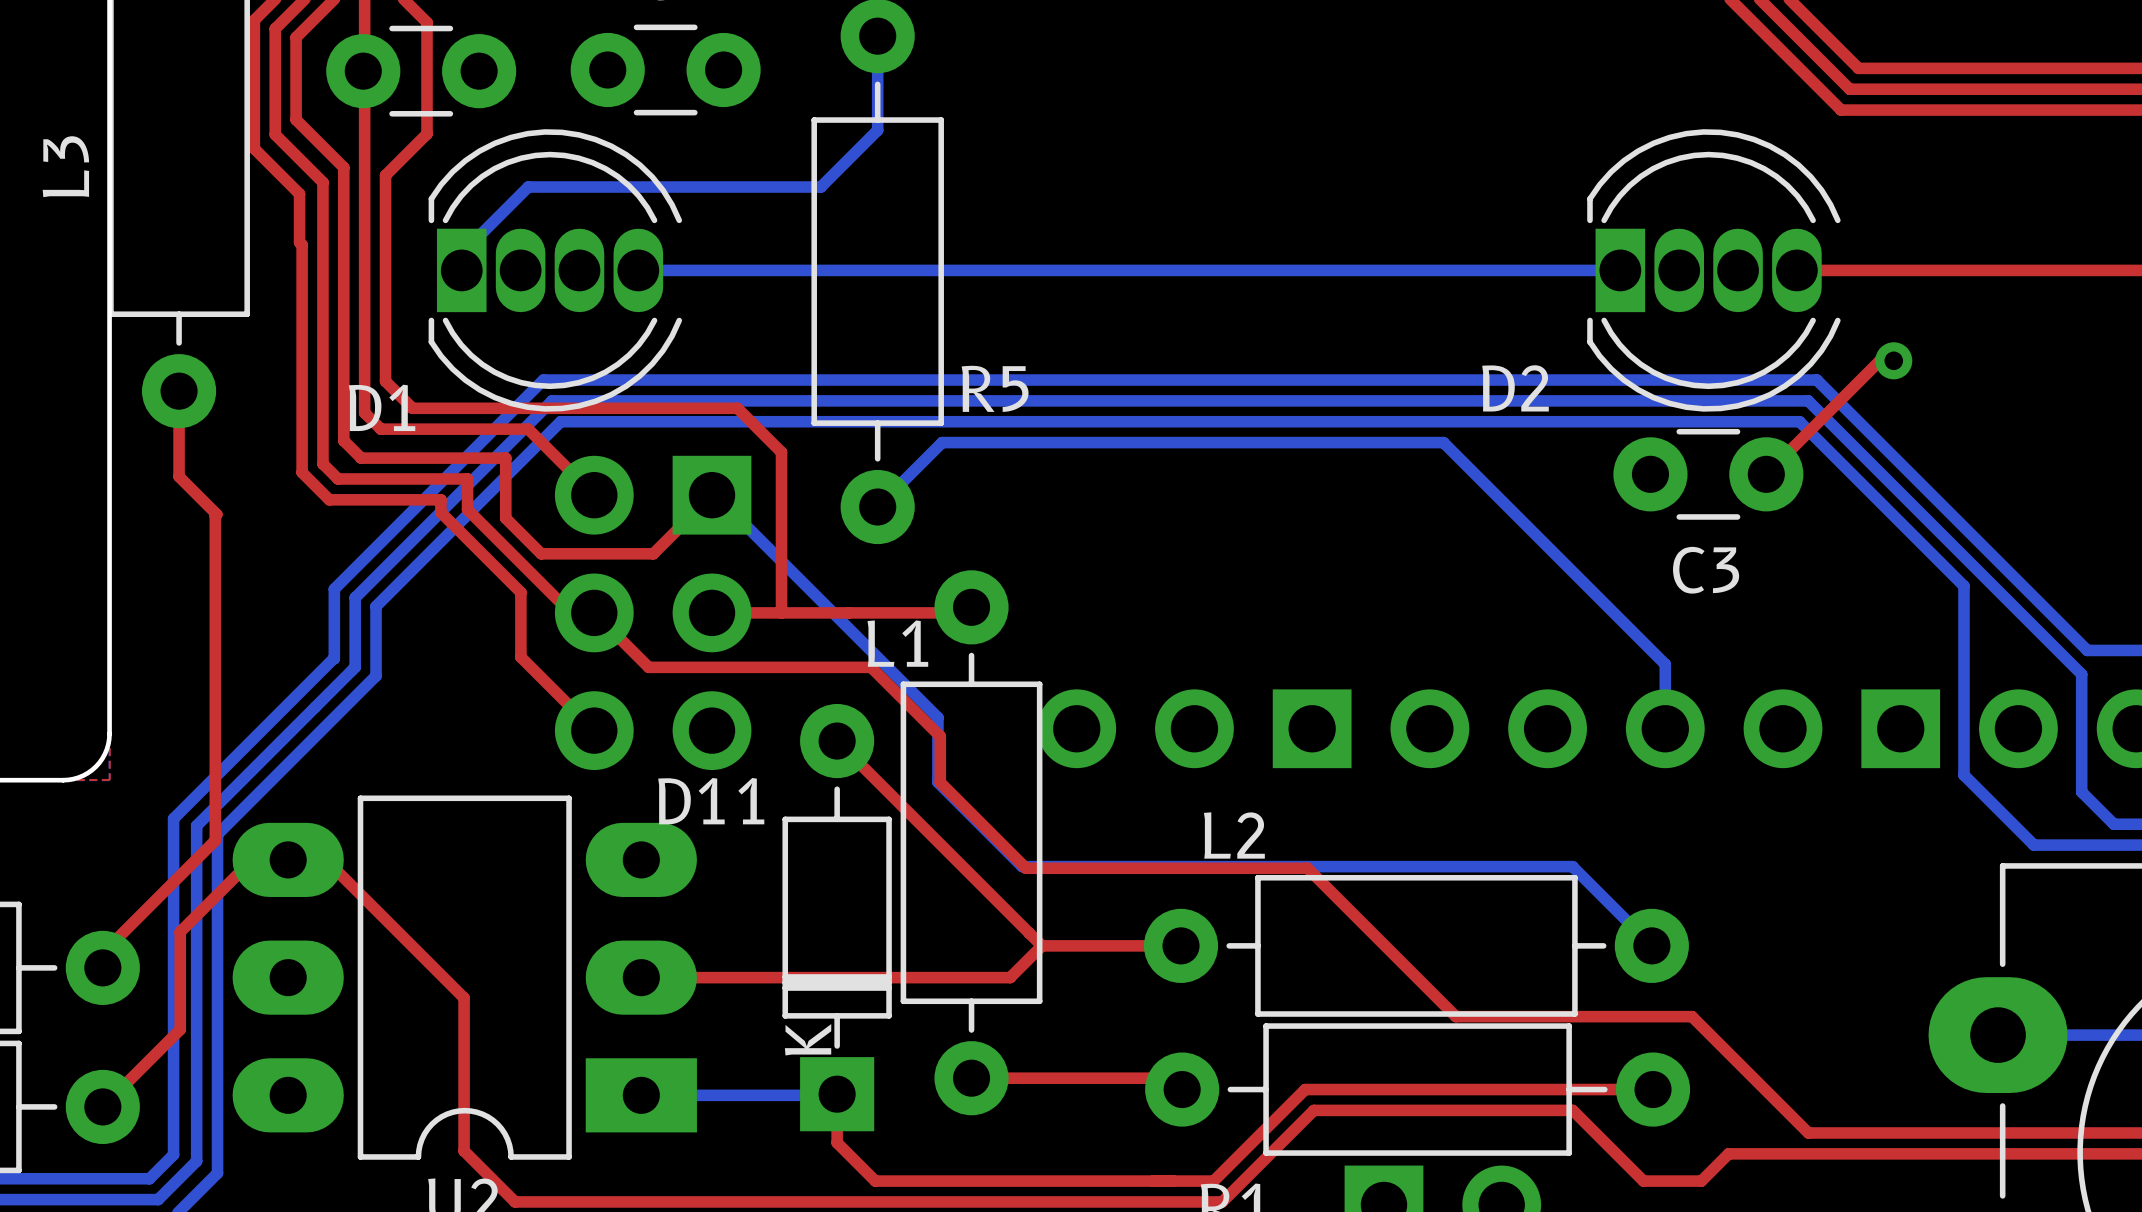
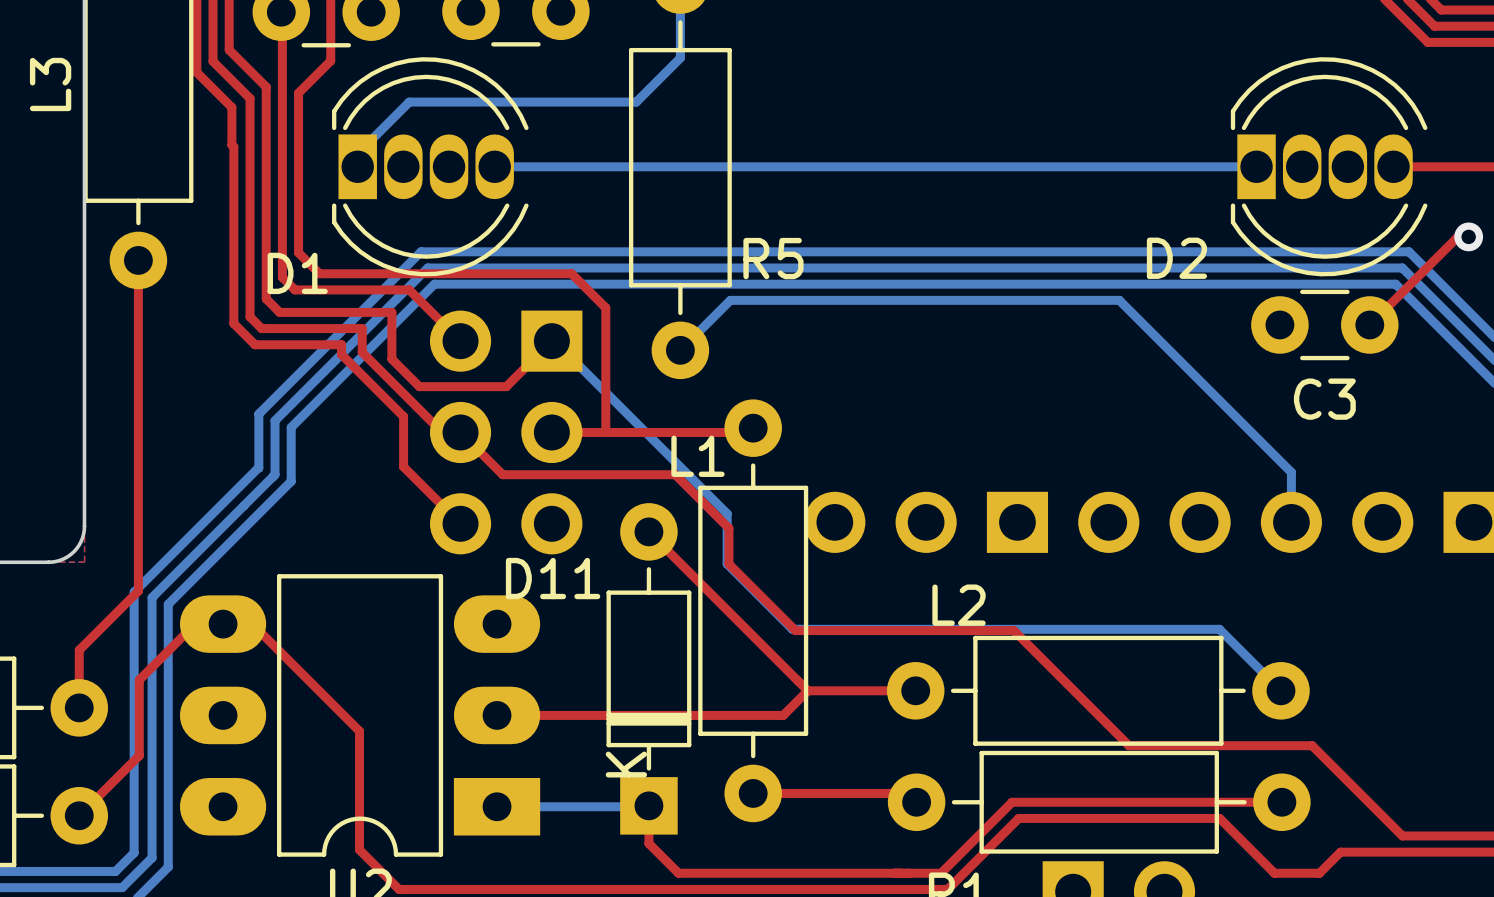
top track: (179, 476) (216, 514) (215, 515) (215, 840) (102, 953) -> (138, 326) (138, 591) (79, 650) (79, 696)

